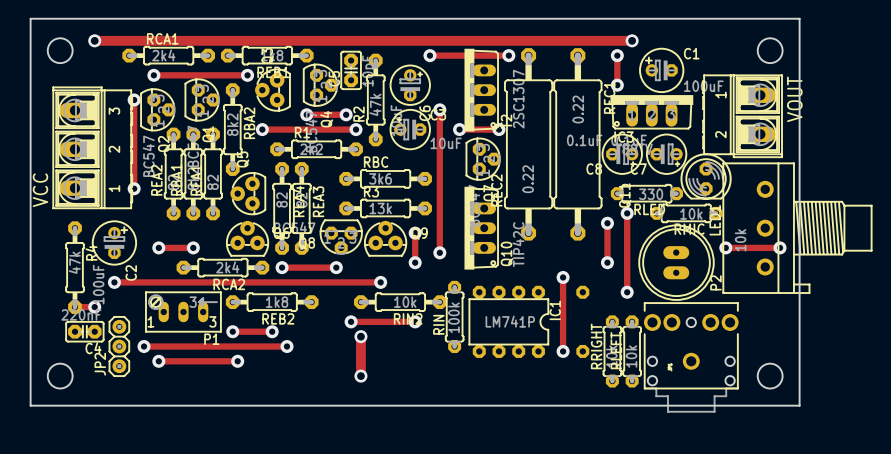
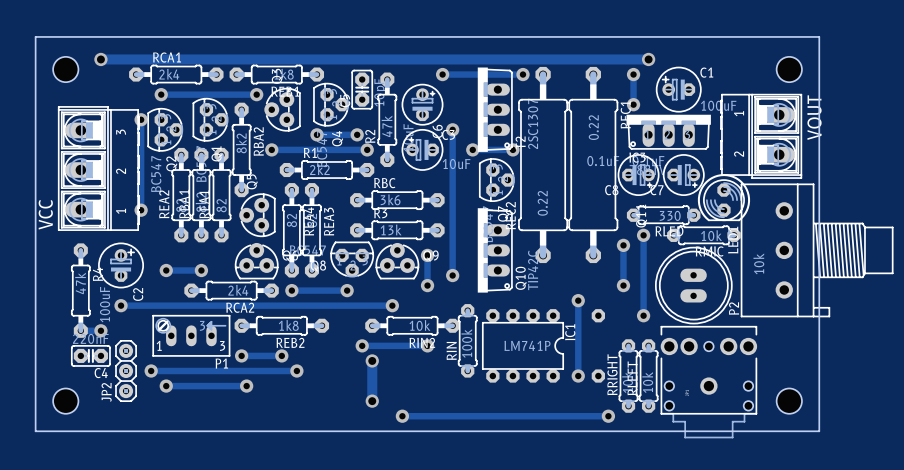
track: (725, 247) (780, 247) -> none
via: (725, 247) -> none
via: (780, 247) -> none
track: none -> (402, 416) (608, 416)
via: none -> (402, 416)
via: none -> (608, 416)

